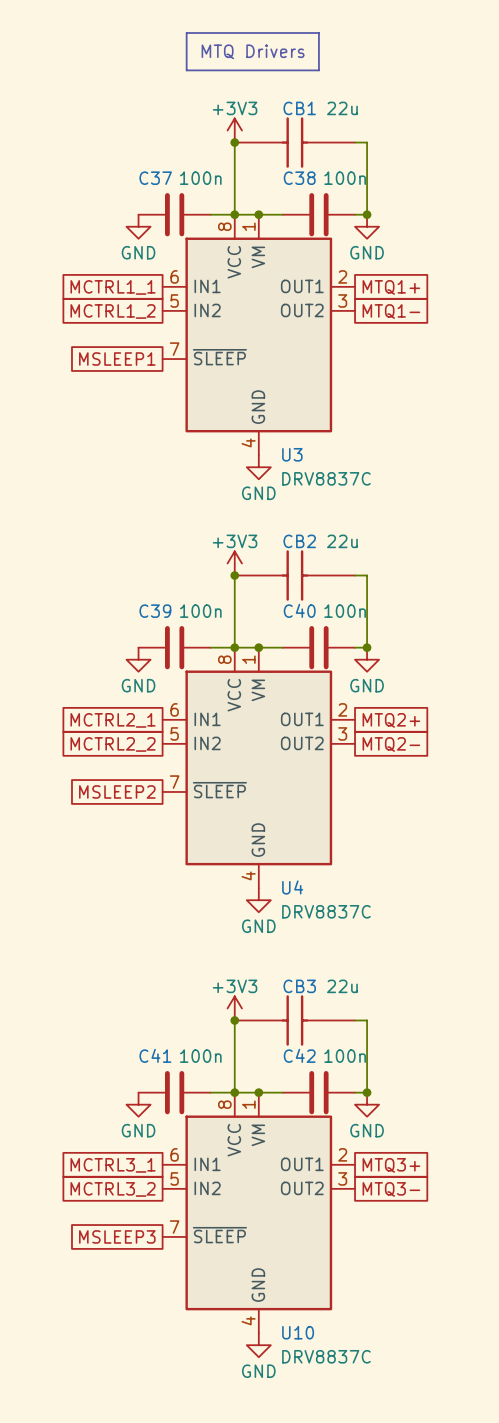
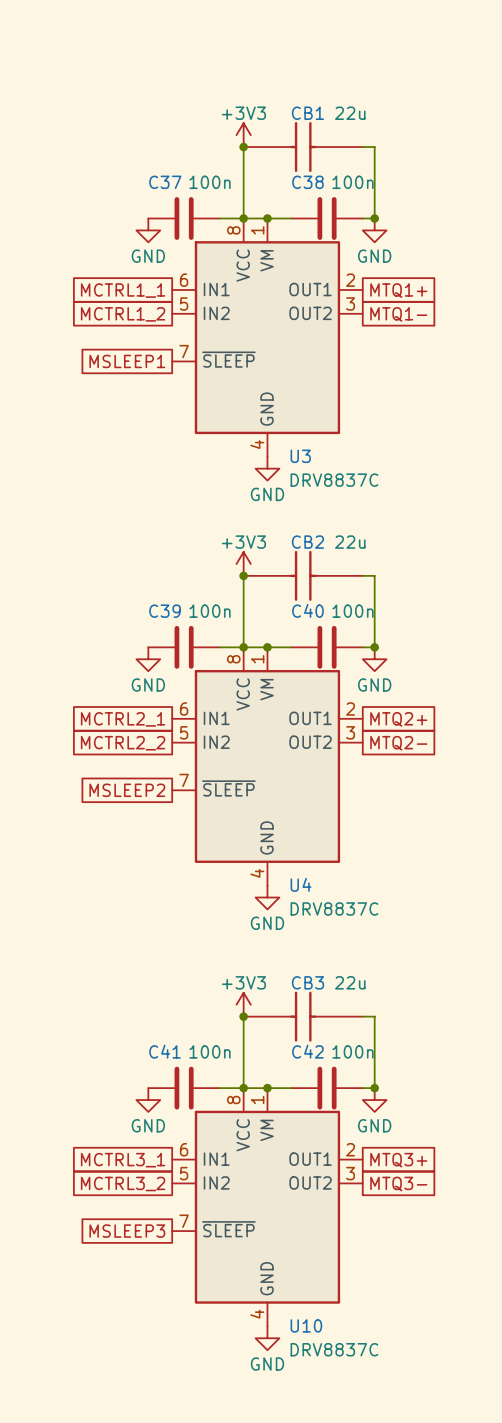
line: (186, 33) (318, 33) (318, 70) (186, 70) (186, 33) -> none
text: MTQ Drivers (253, 51) -> none

